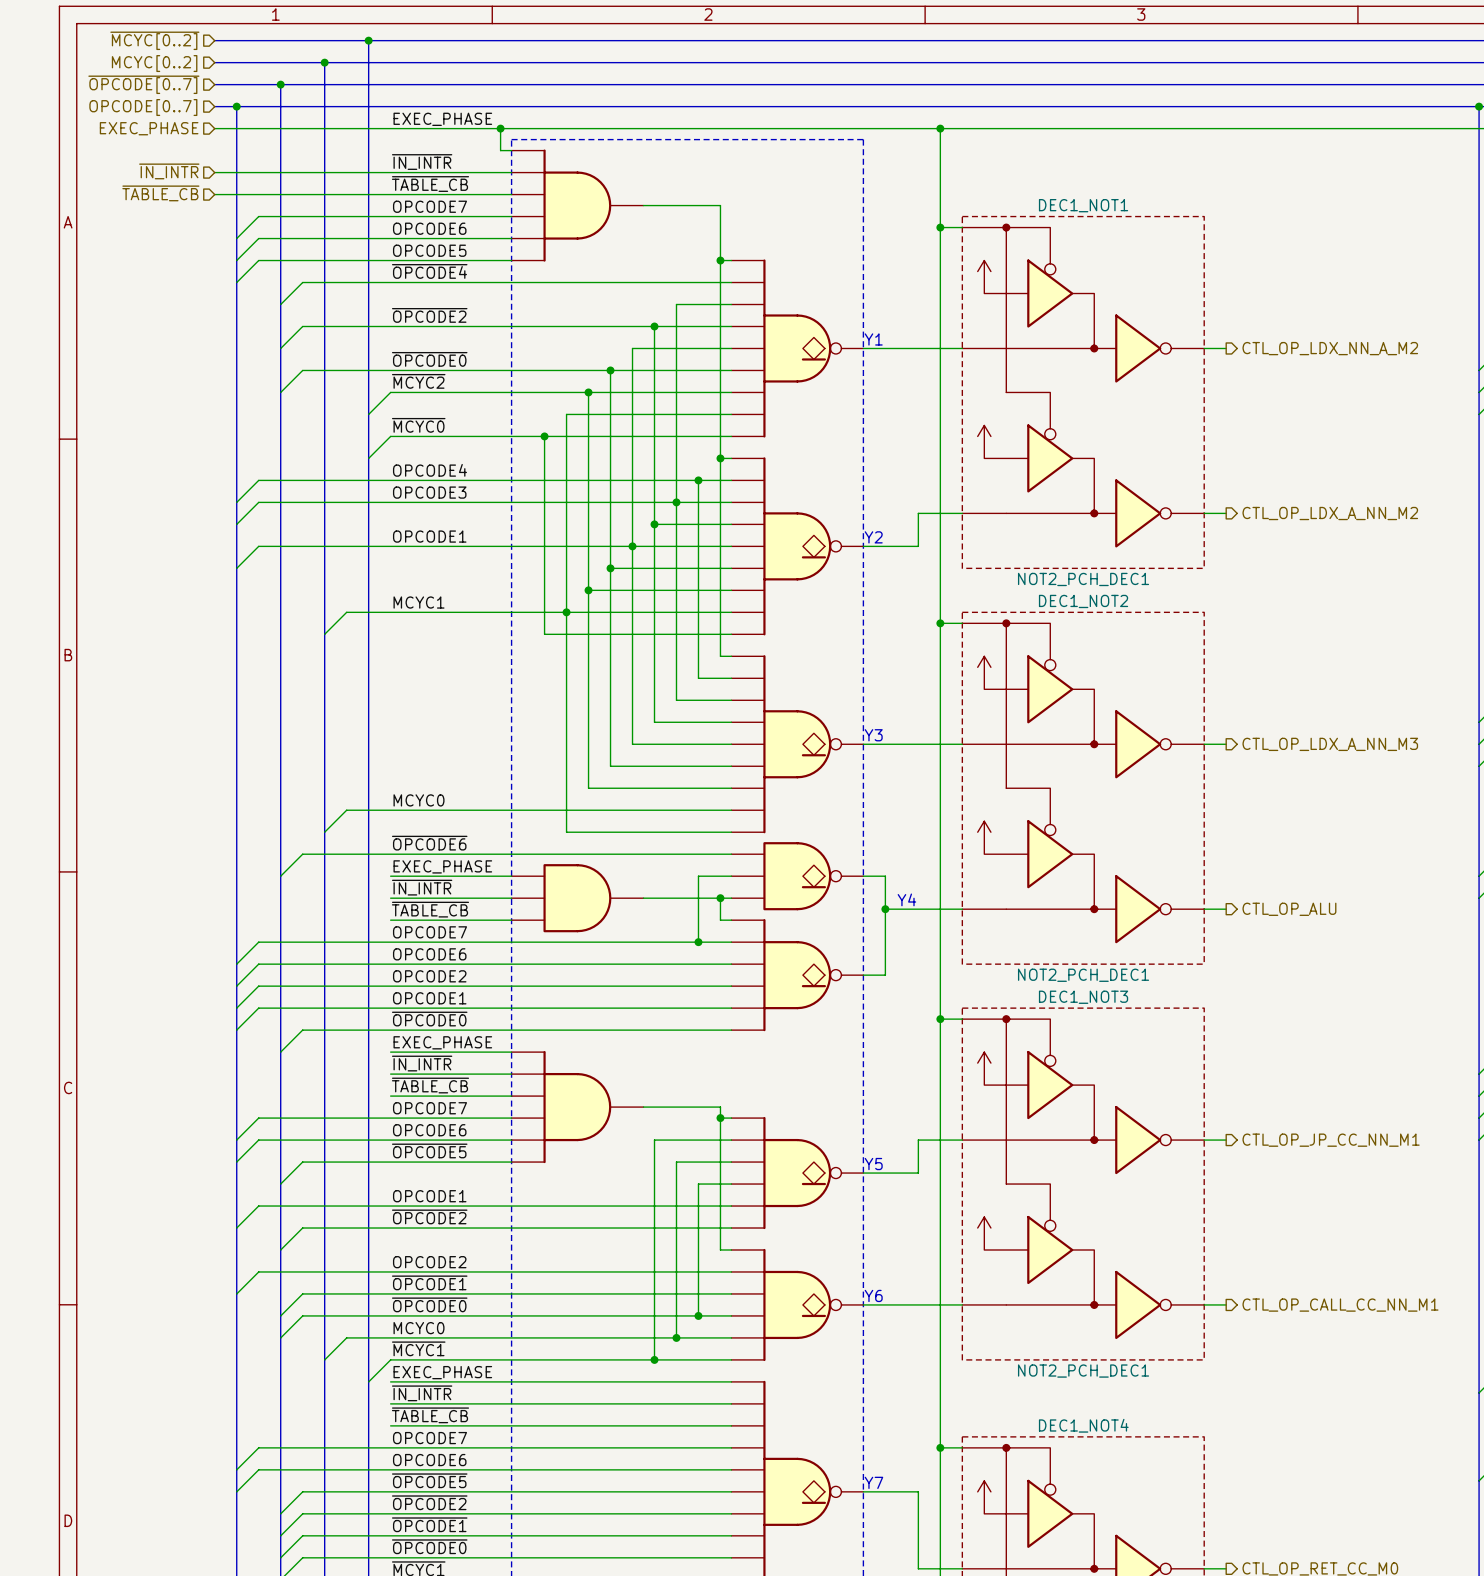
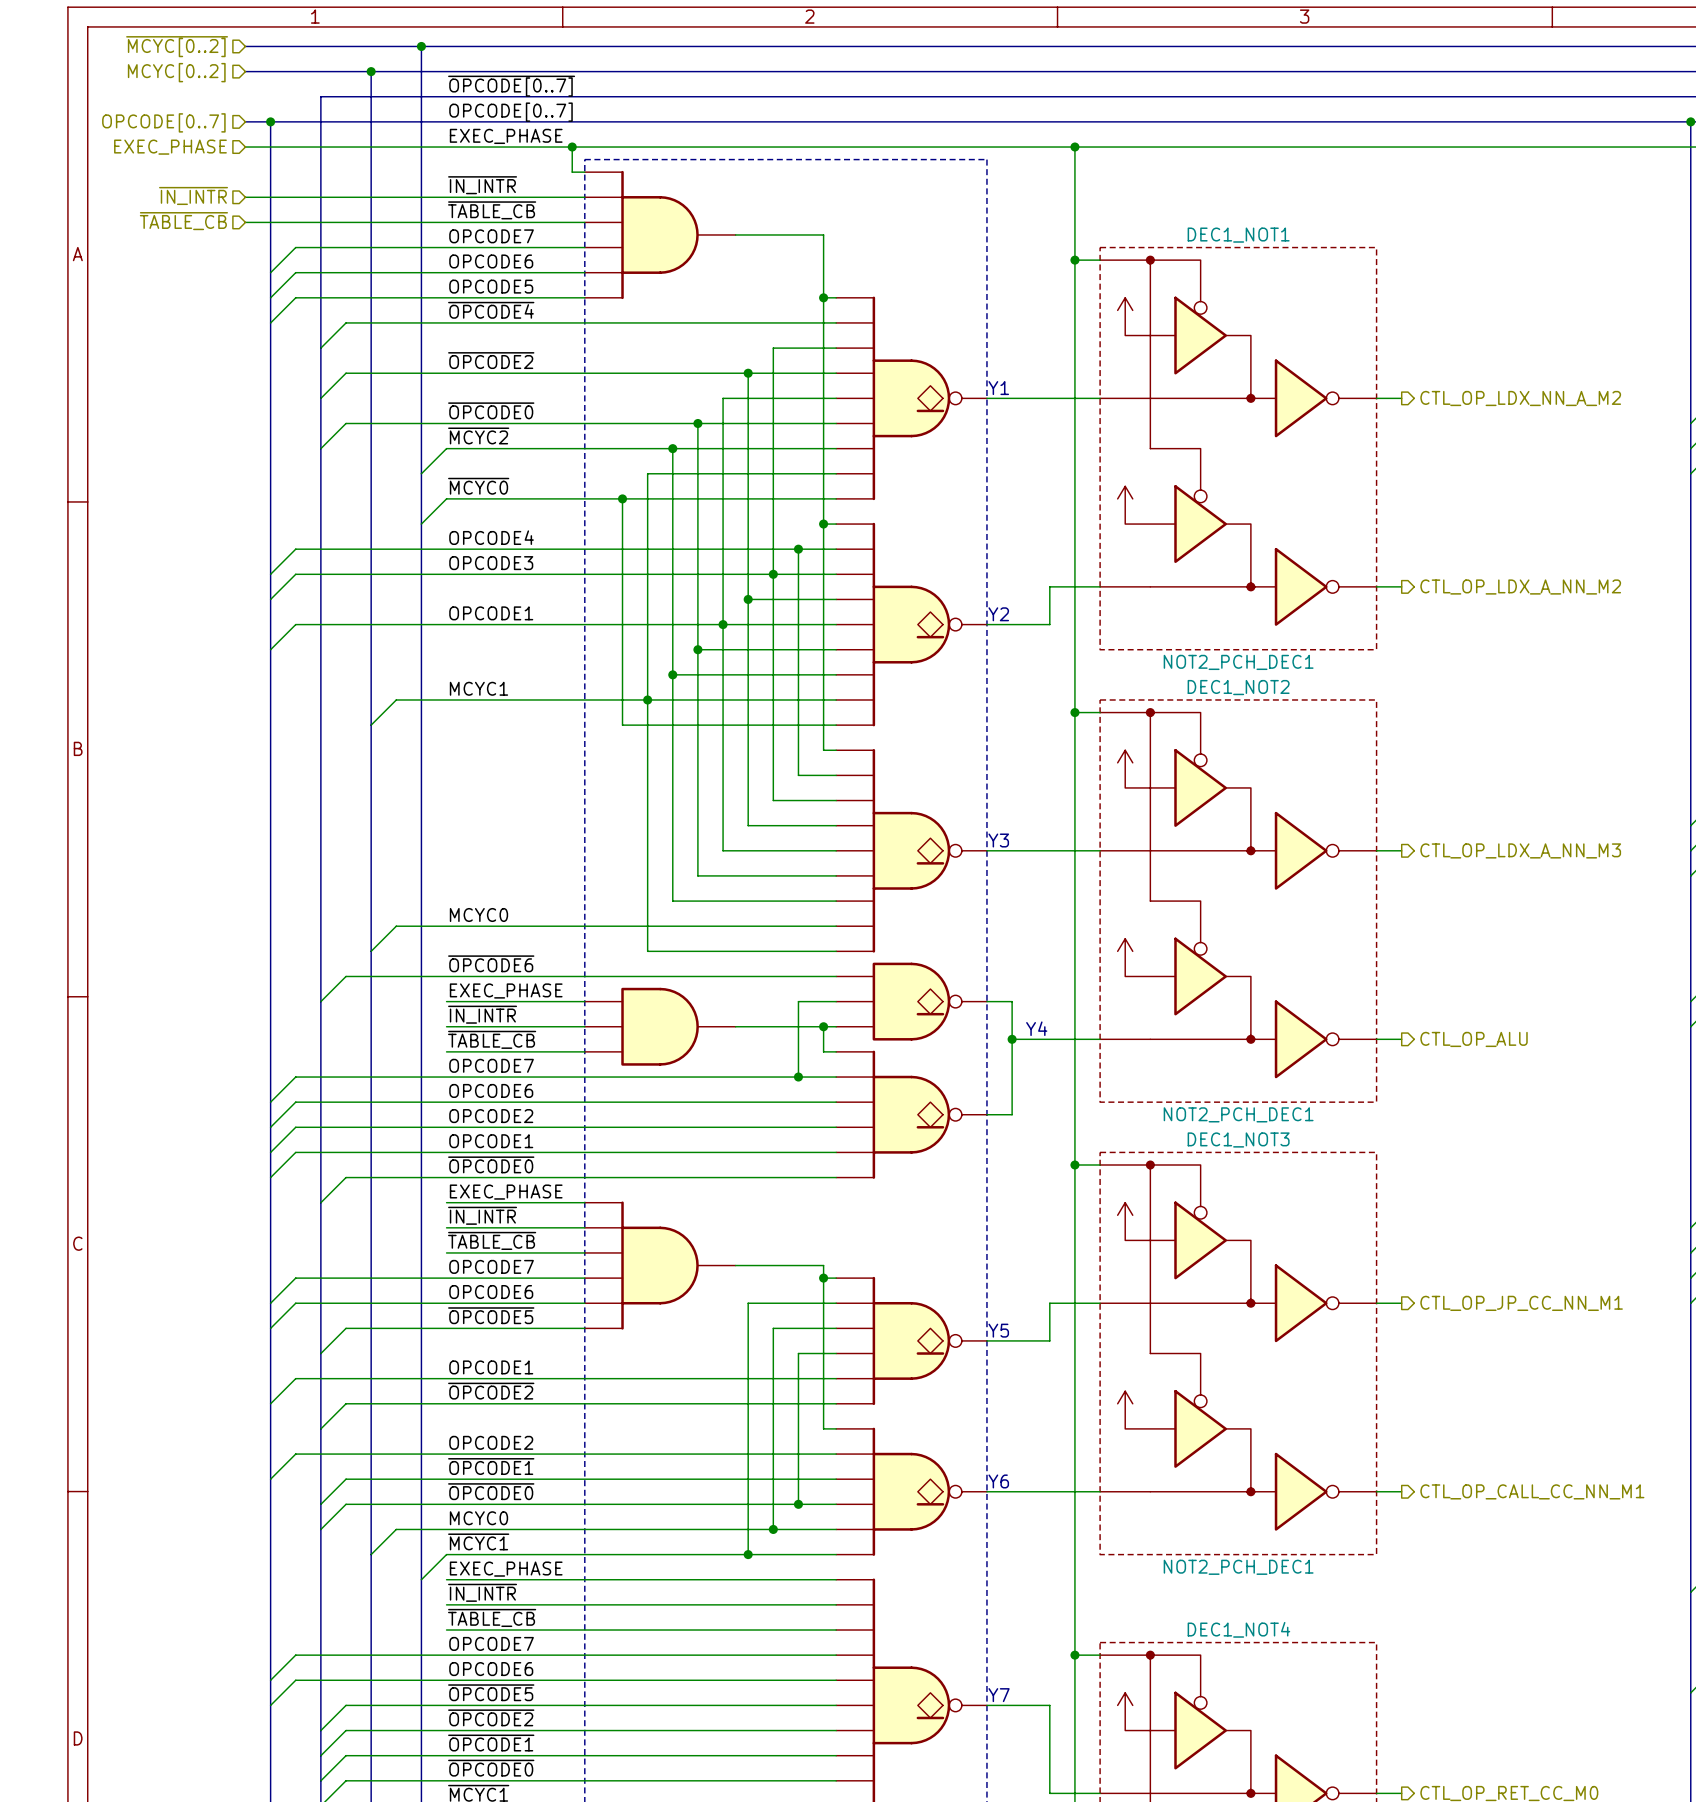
label: none -> ~{OPCODE[0..7]} (511, 86)
hierarchical label: ~{OPCODE[0..7]} (143, 84) -> none
bus: (214, 84) (280, 84) -> none
junction: (280, 84) -> none
label: none -> OPCODE[0..7] (510, 112)

